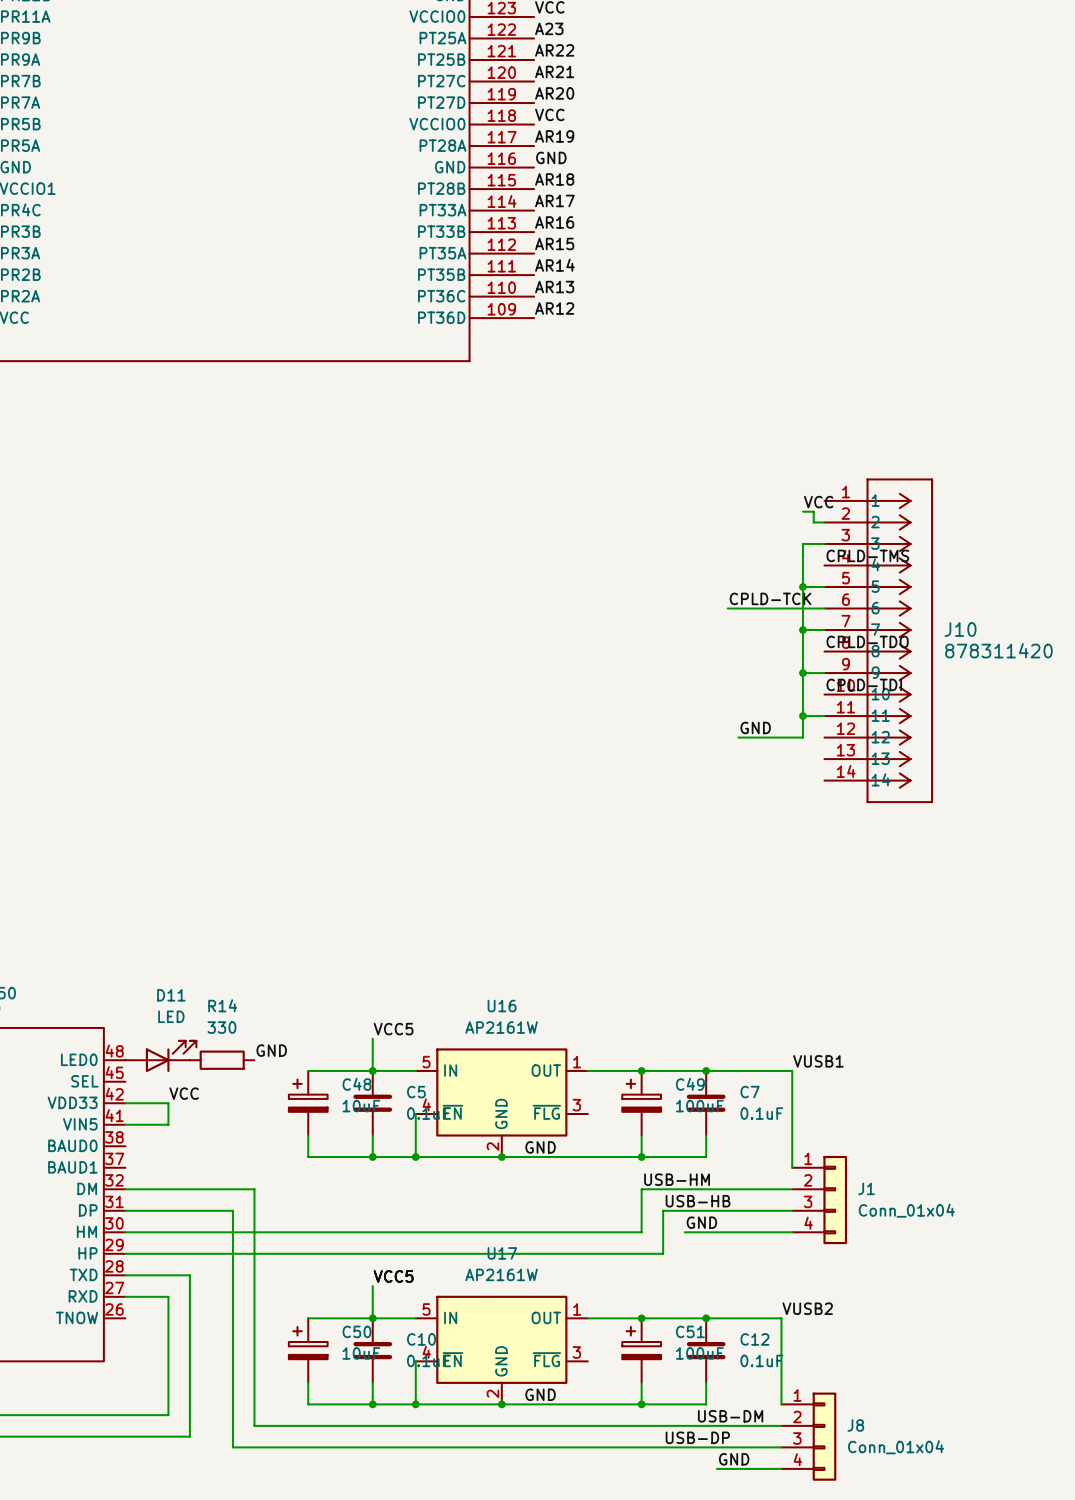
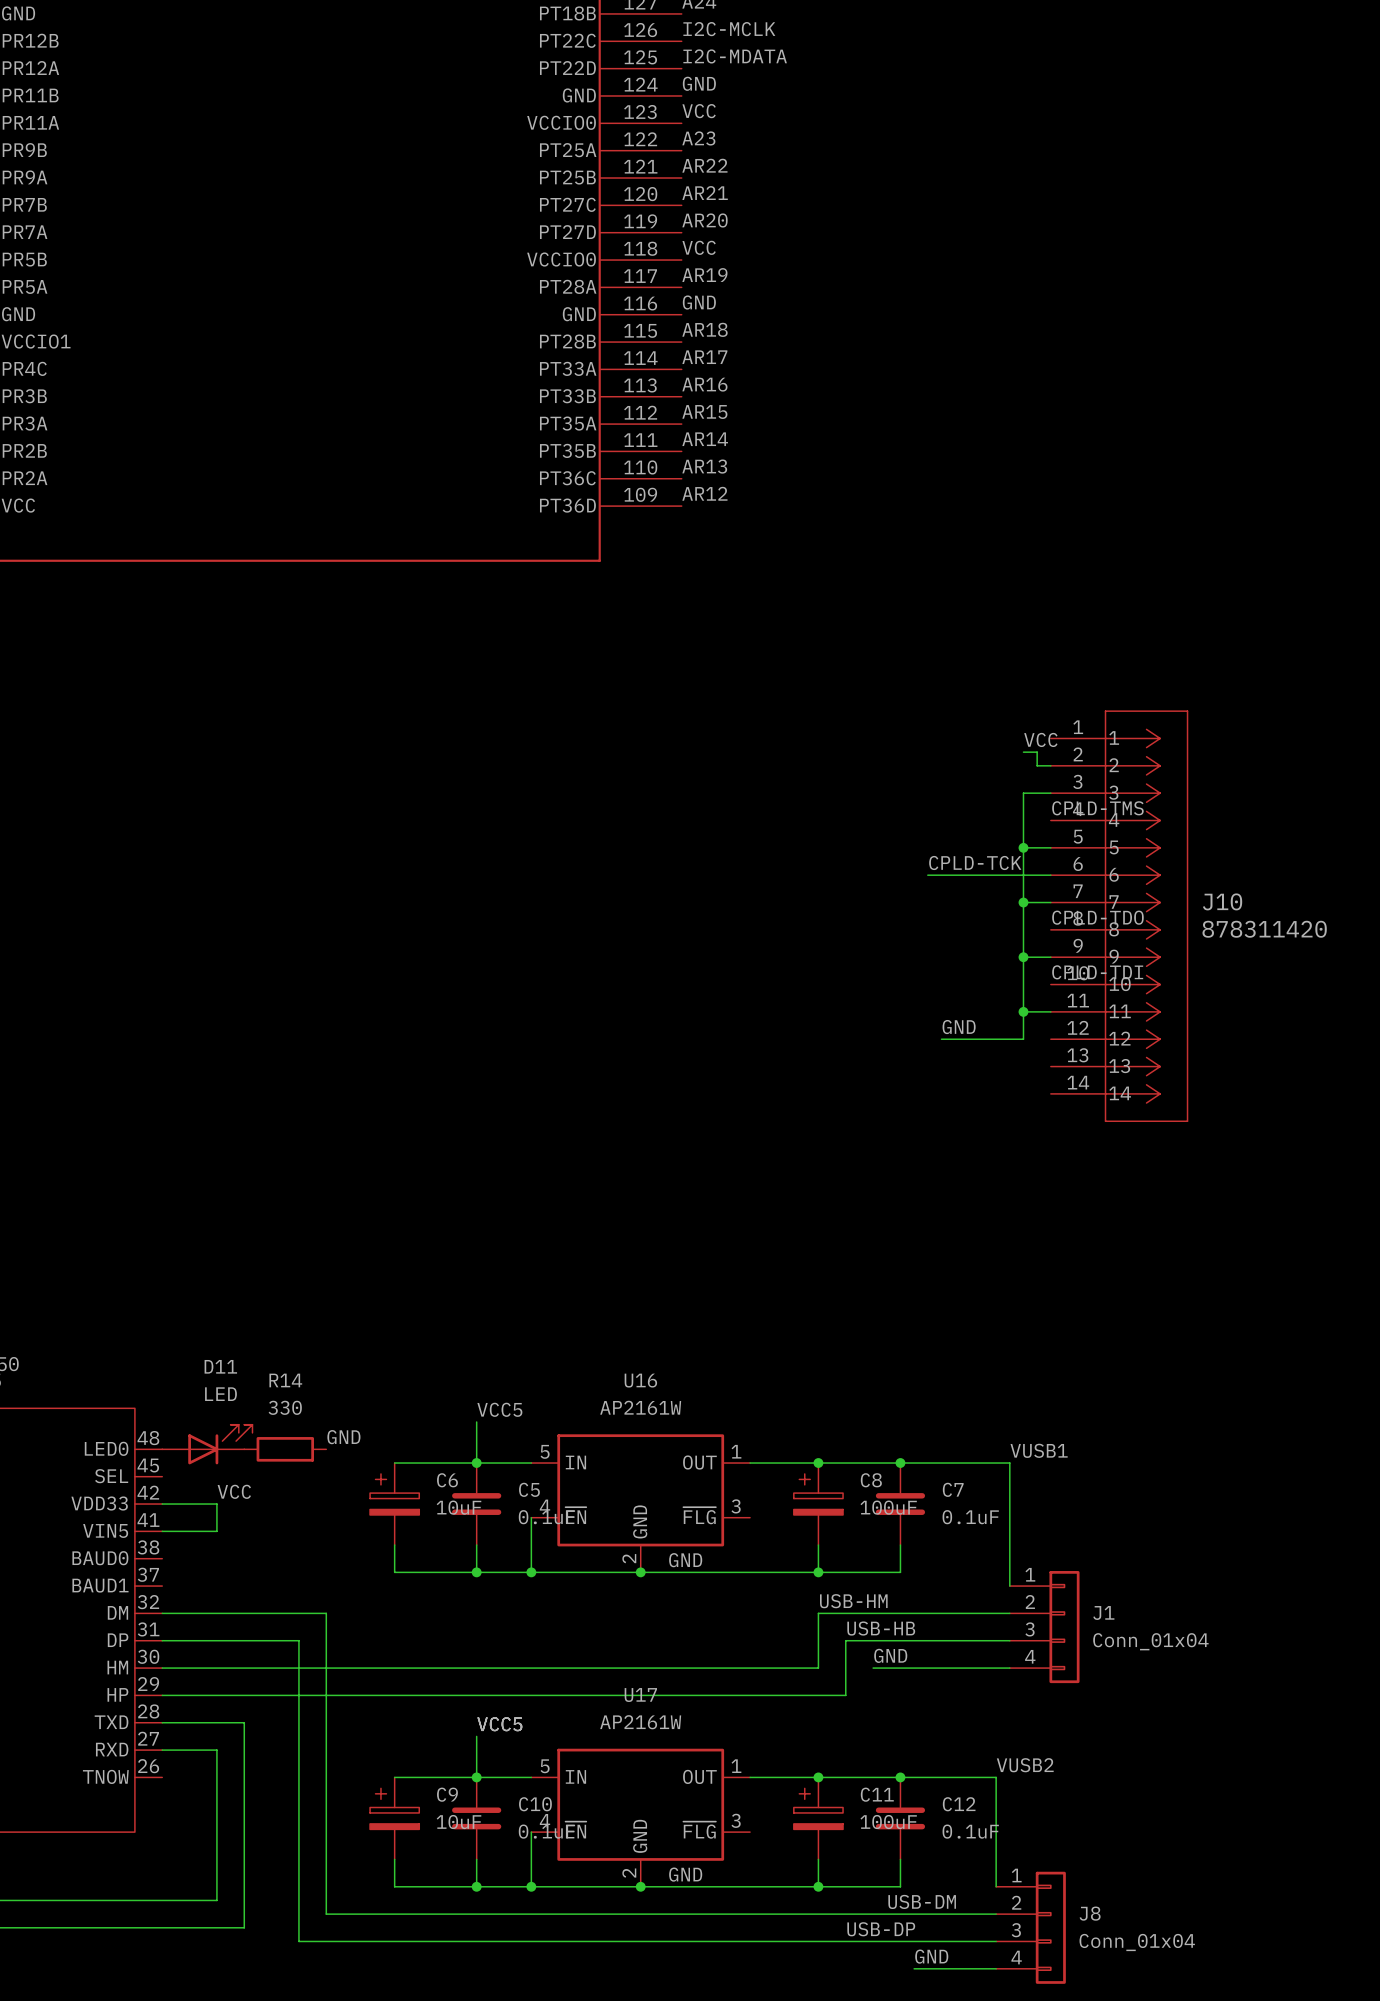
C48 name: C48 (356, 1084) -> C6 (447, 1480)
C49 name: C49 (690, 1084) -> C8 (871, 1480)
C50 name: C50 (356, 1331) -> C9 (447, 1794)
C51 name: C51 (690, 1331) -> C11 (877, 1794)

